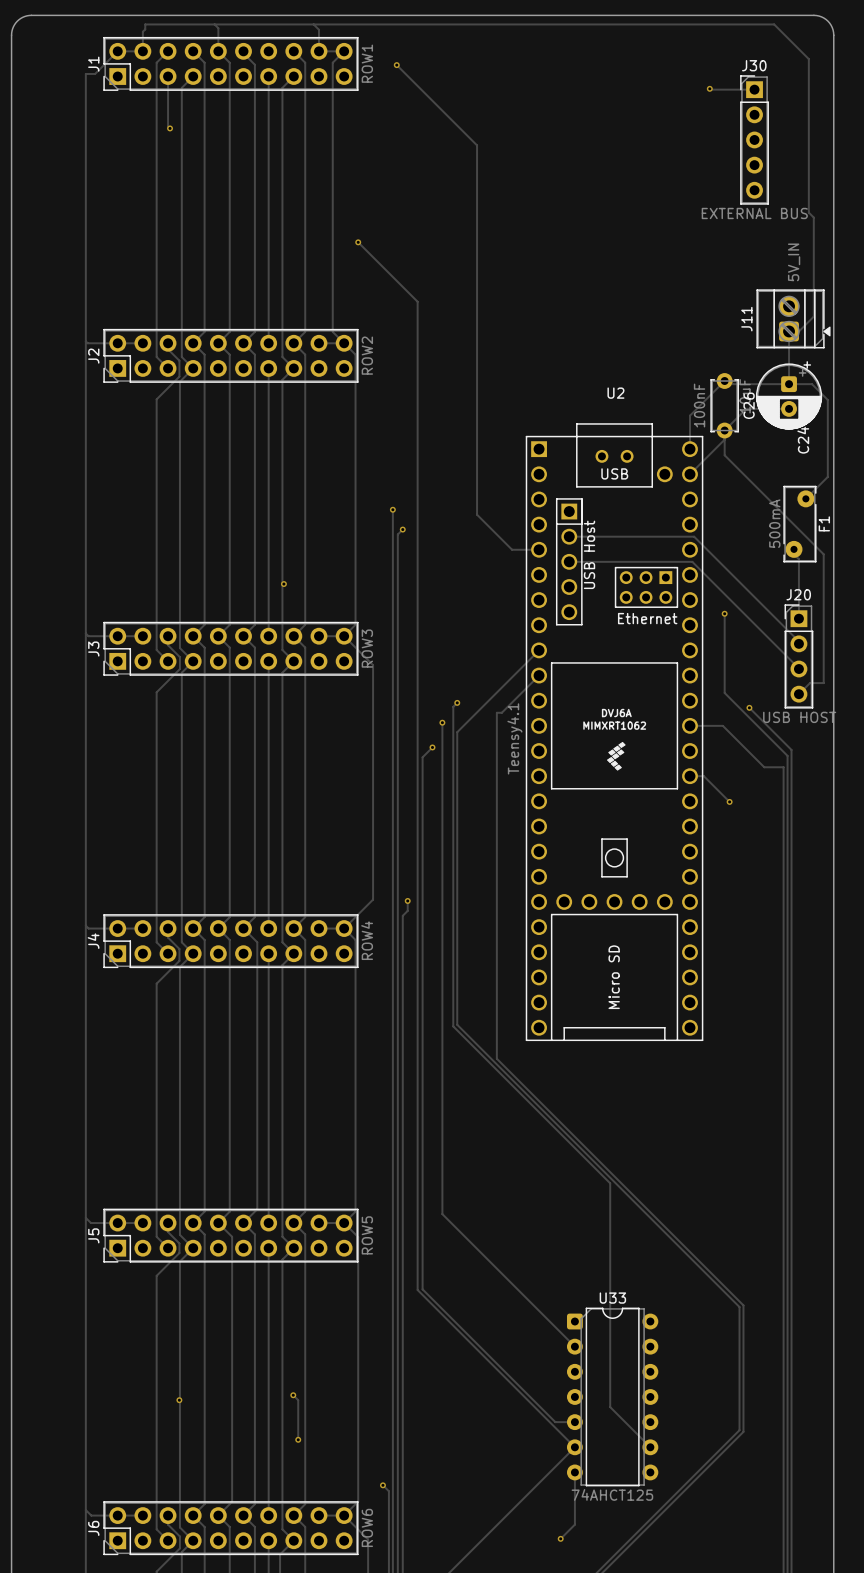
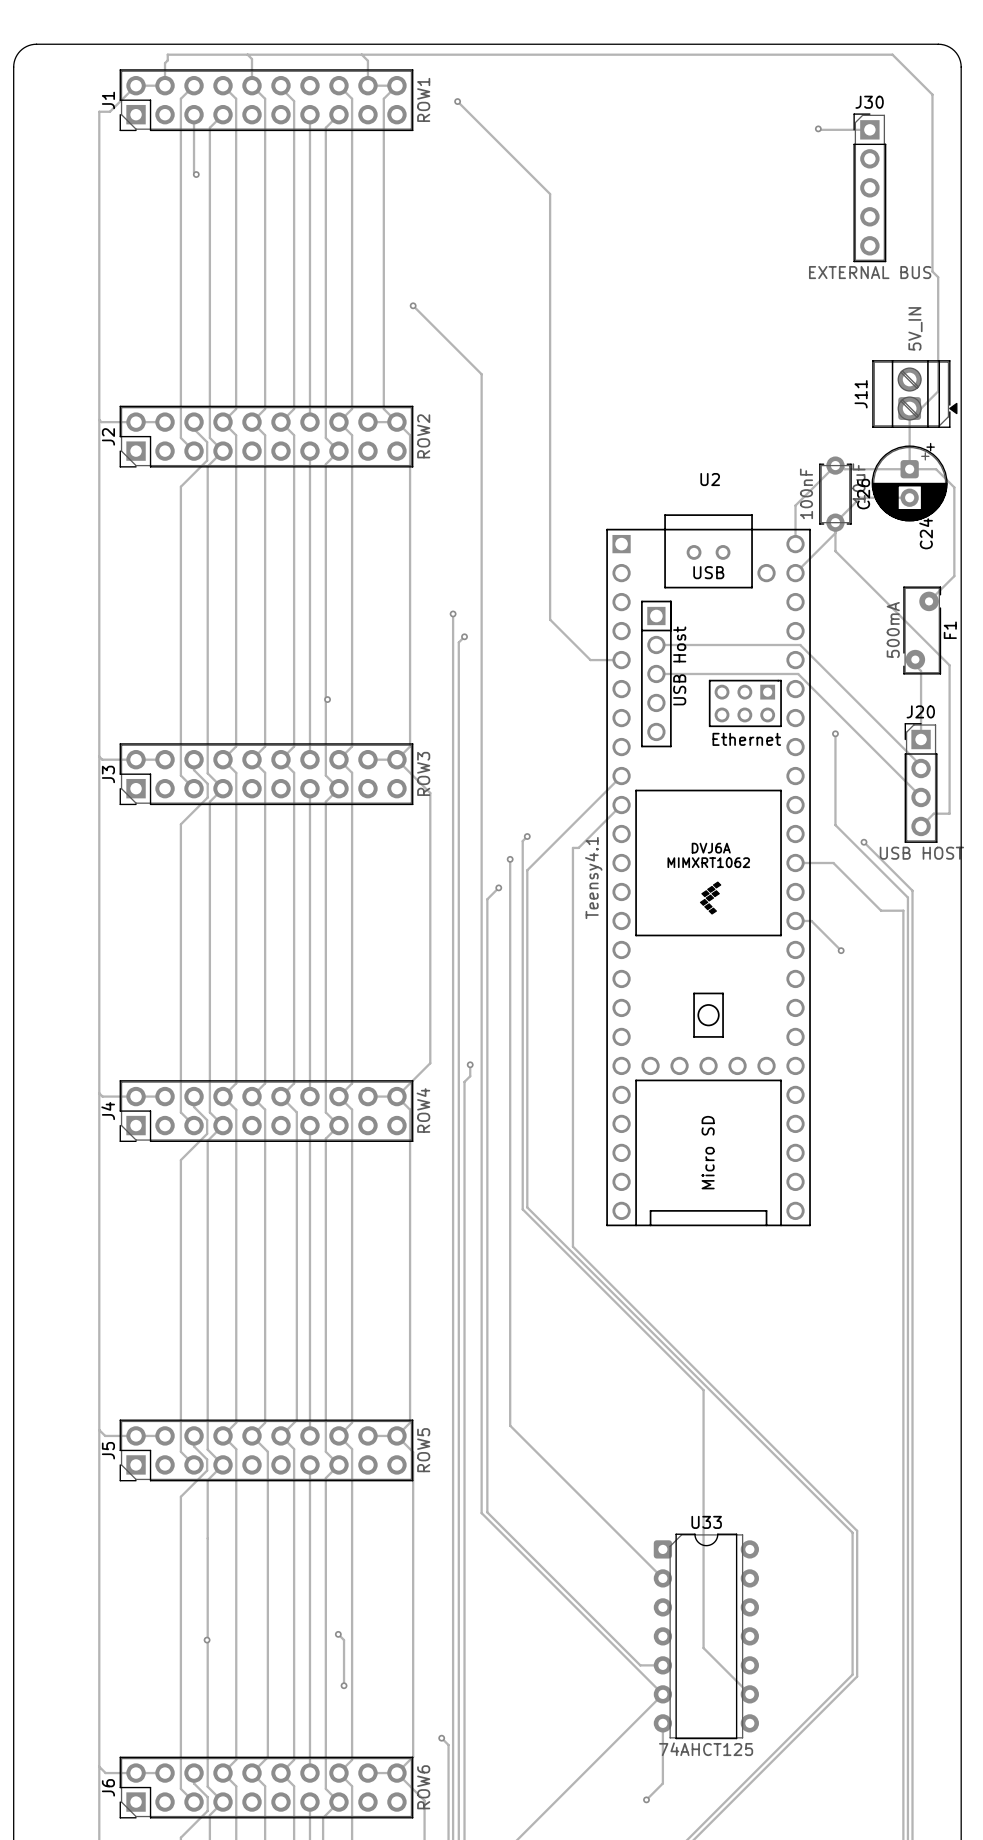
U2 footprint: [525, 423, 704, 1042] -> [606, 514, 811, 1227]

